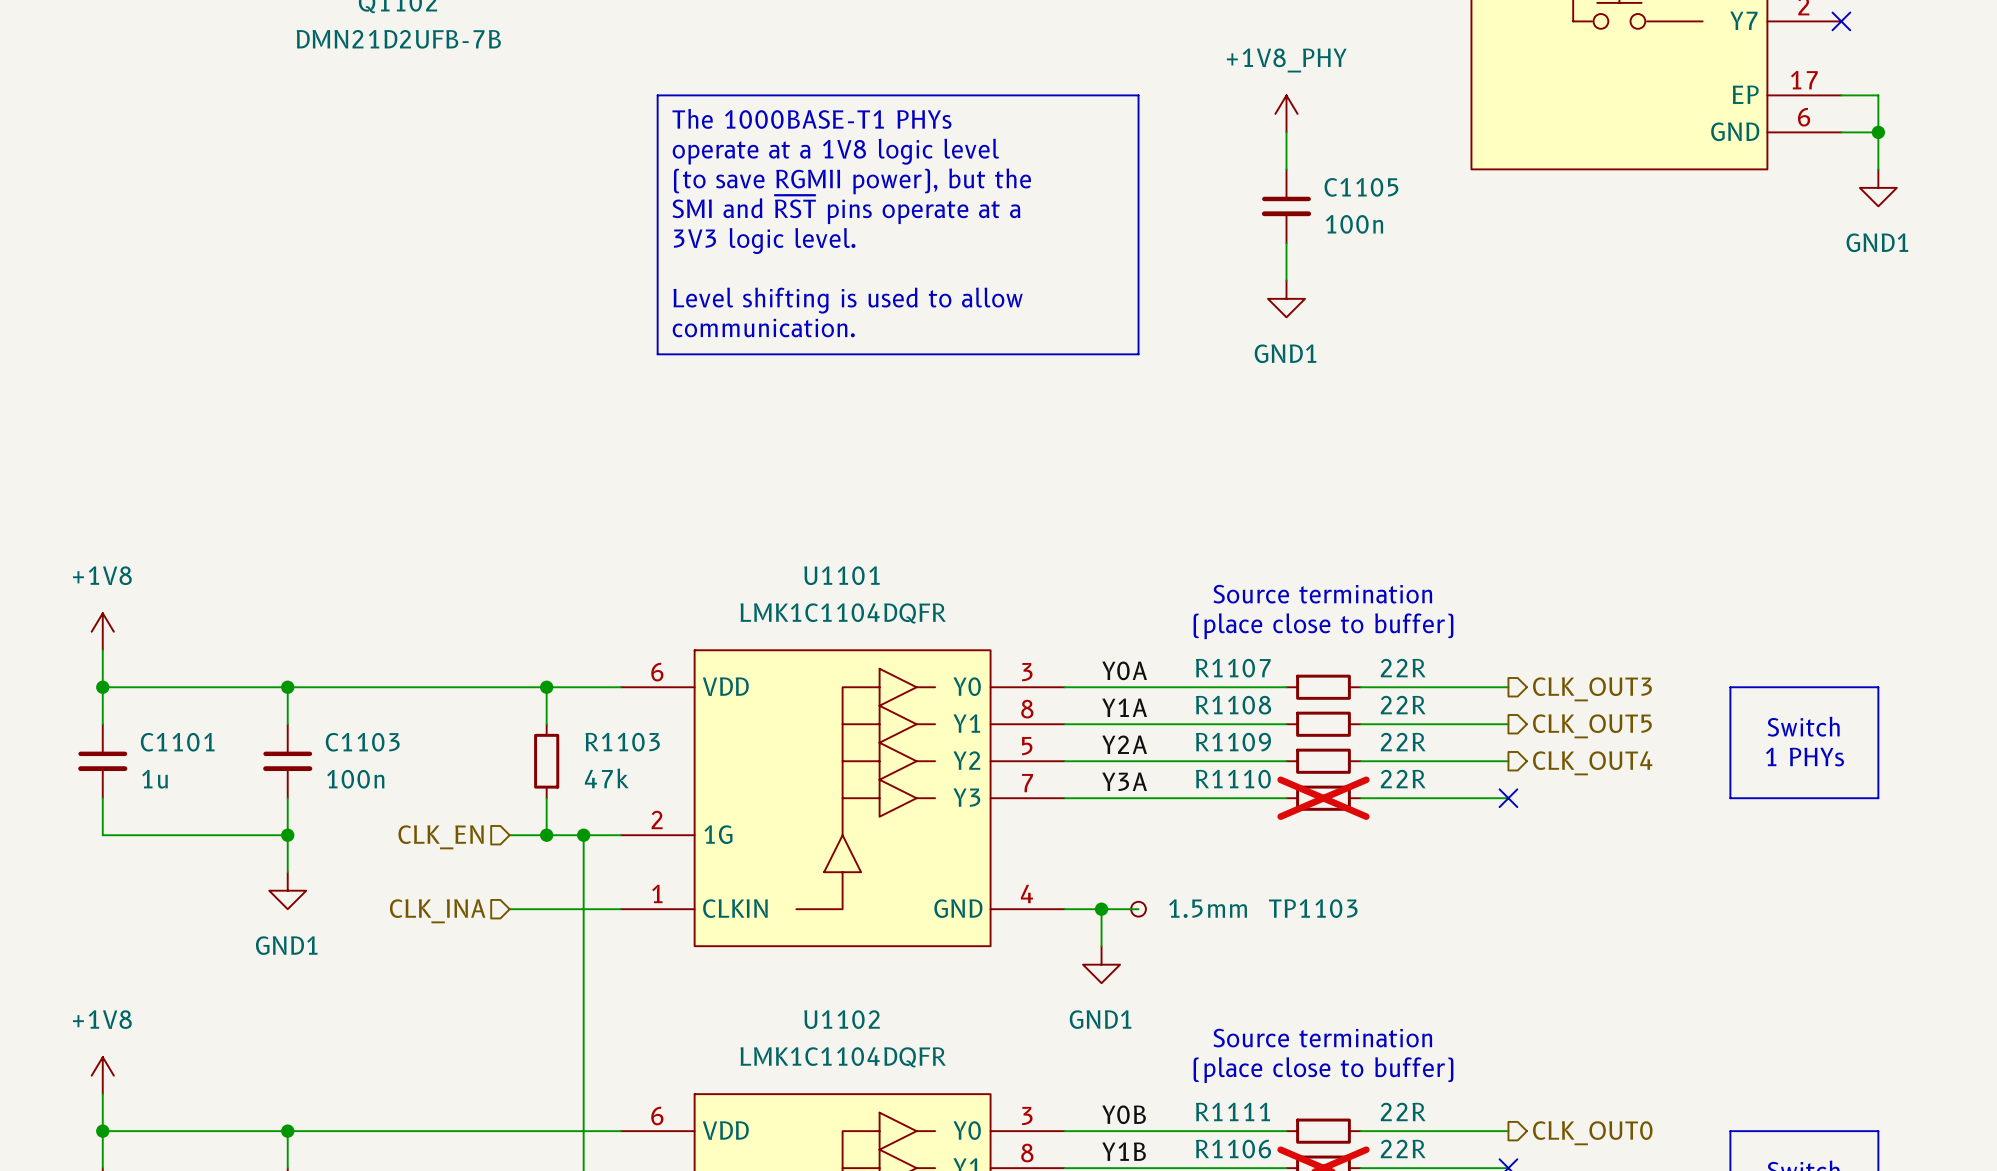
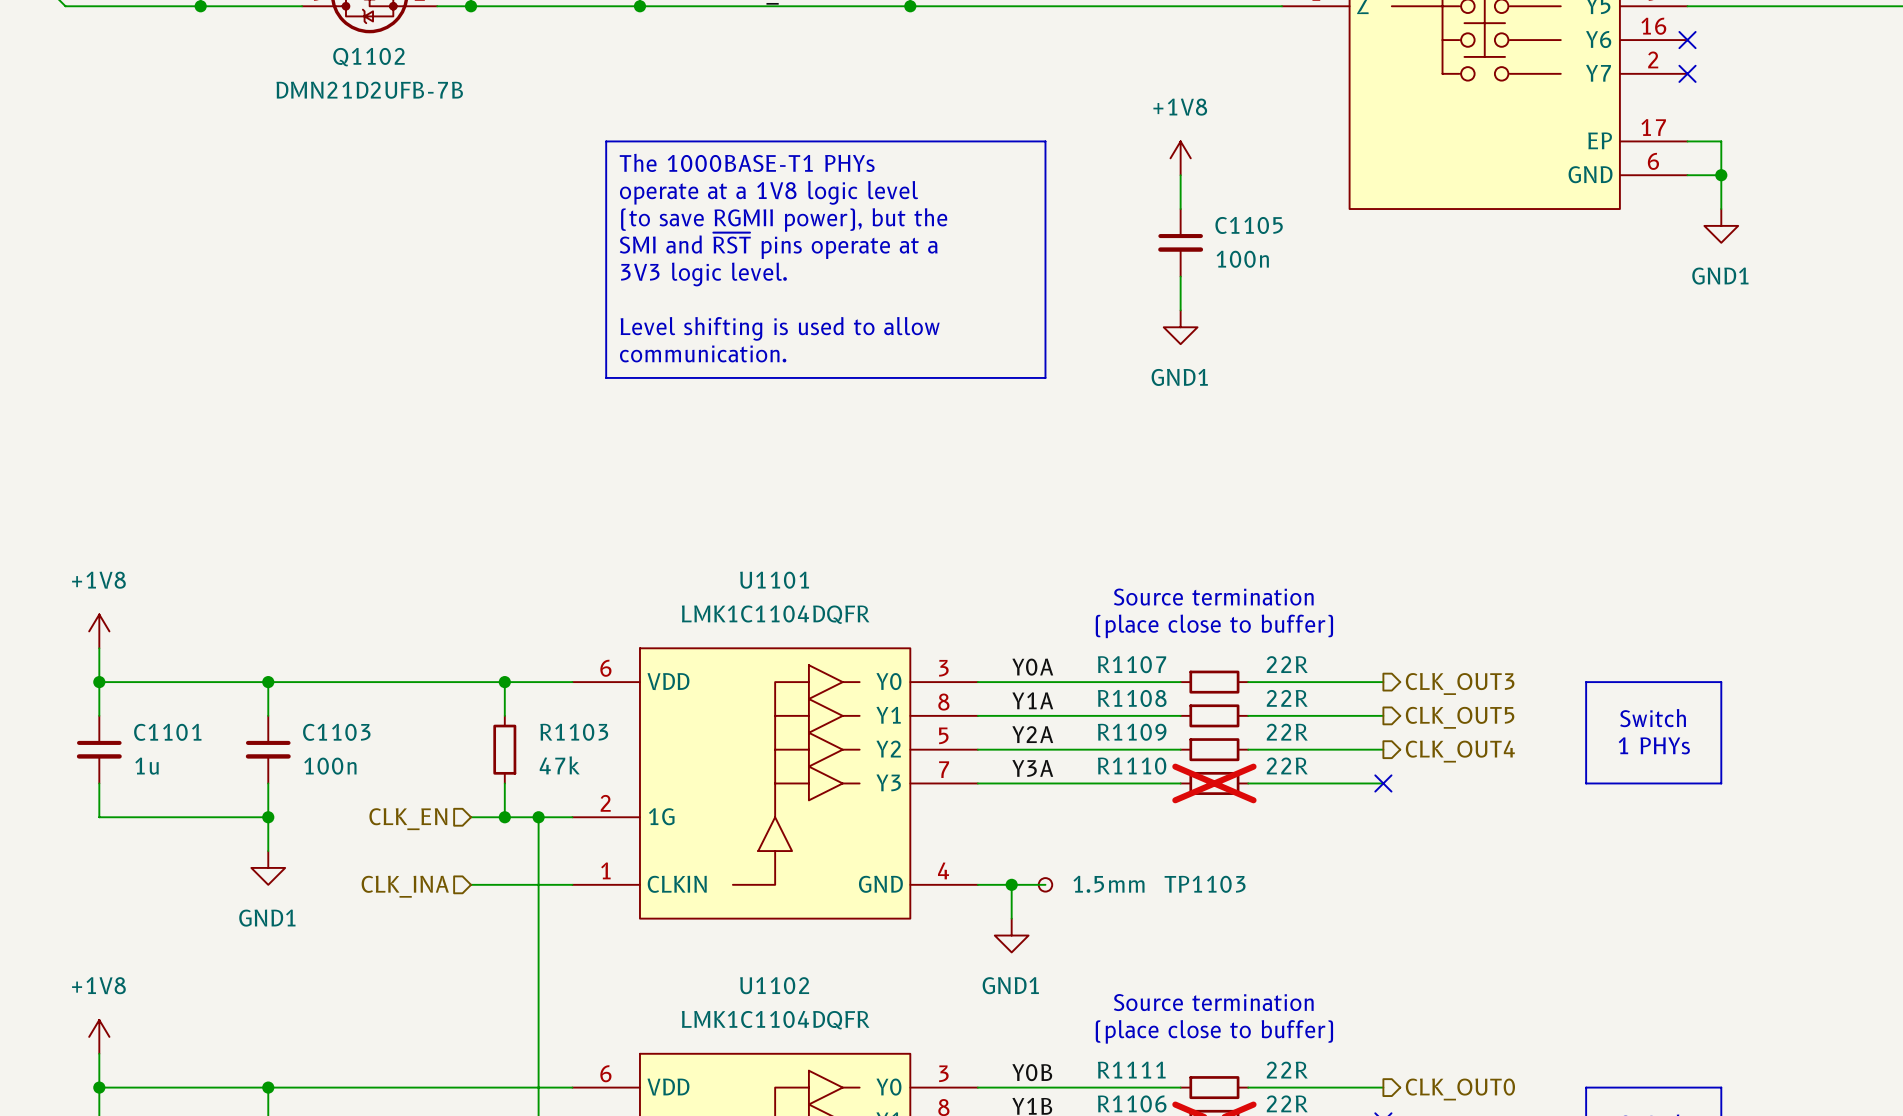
power symbol: +1V8_PHY (1286, 113) -> +1V8 (1180, 158)

